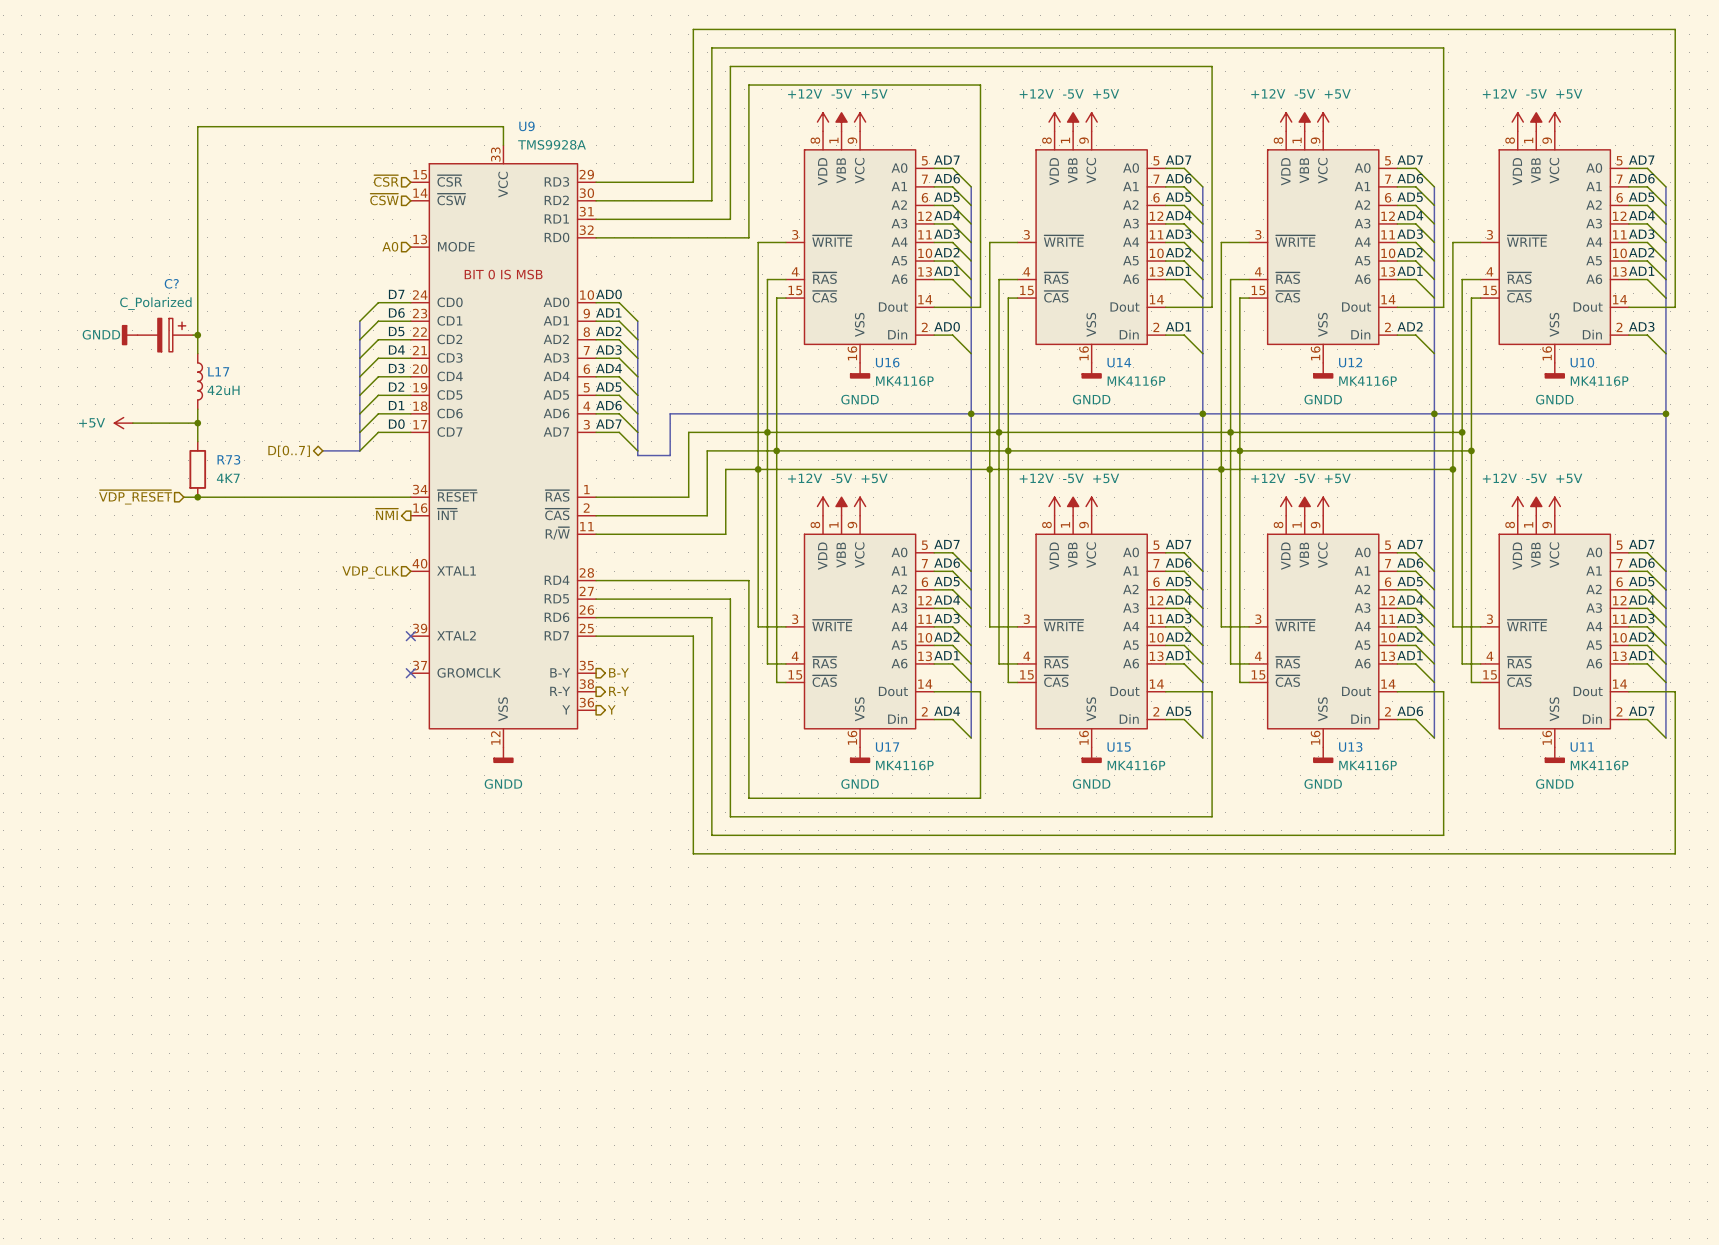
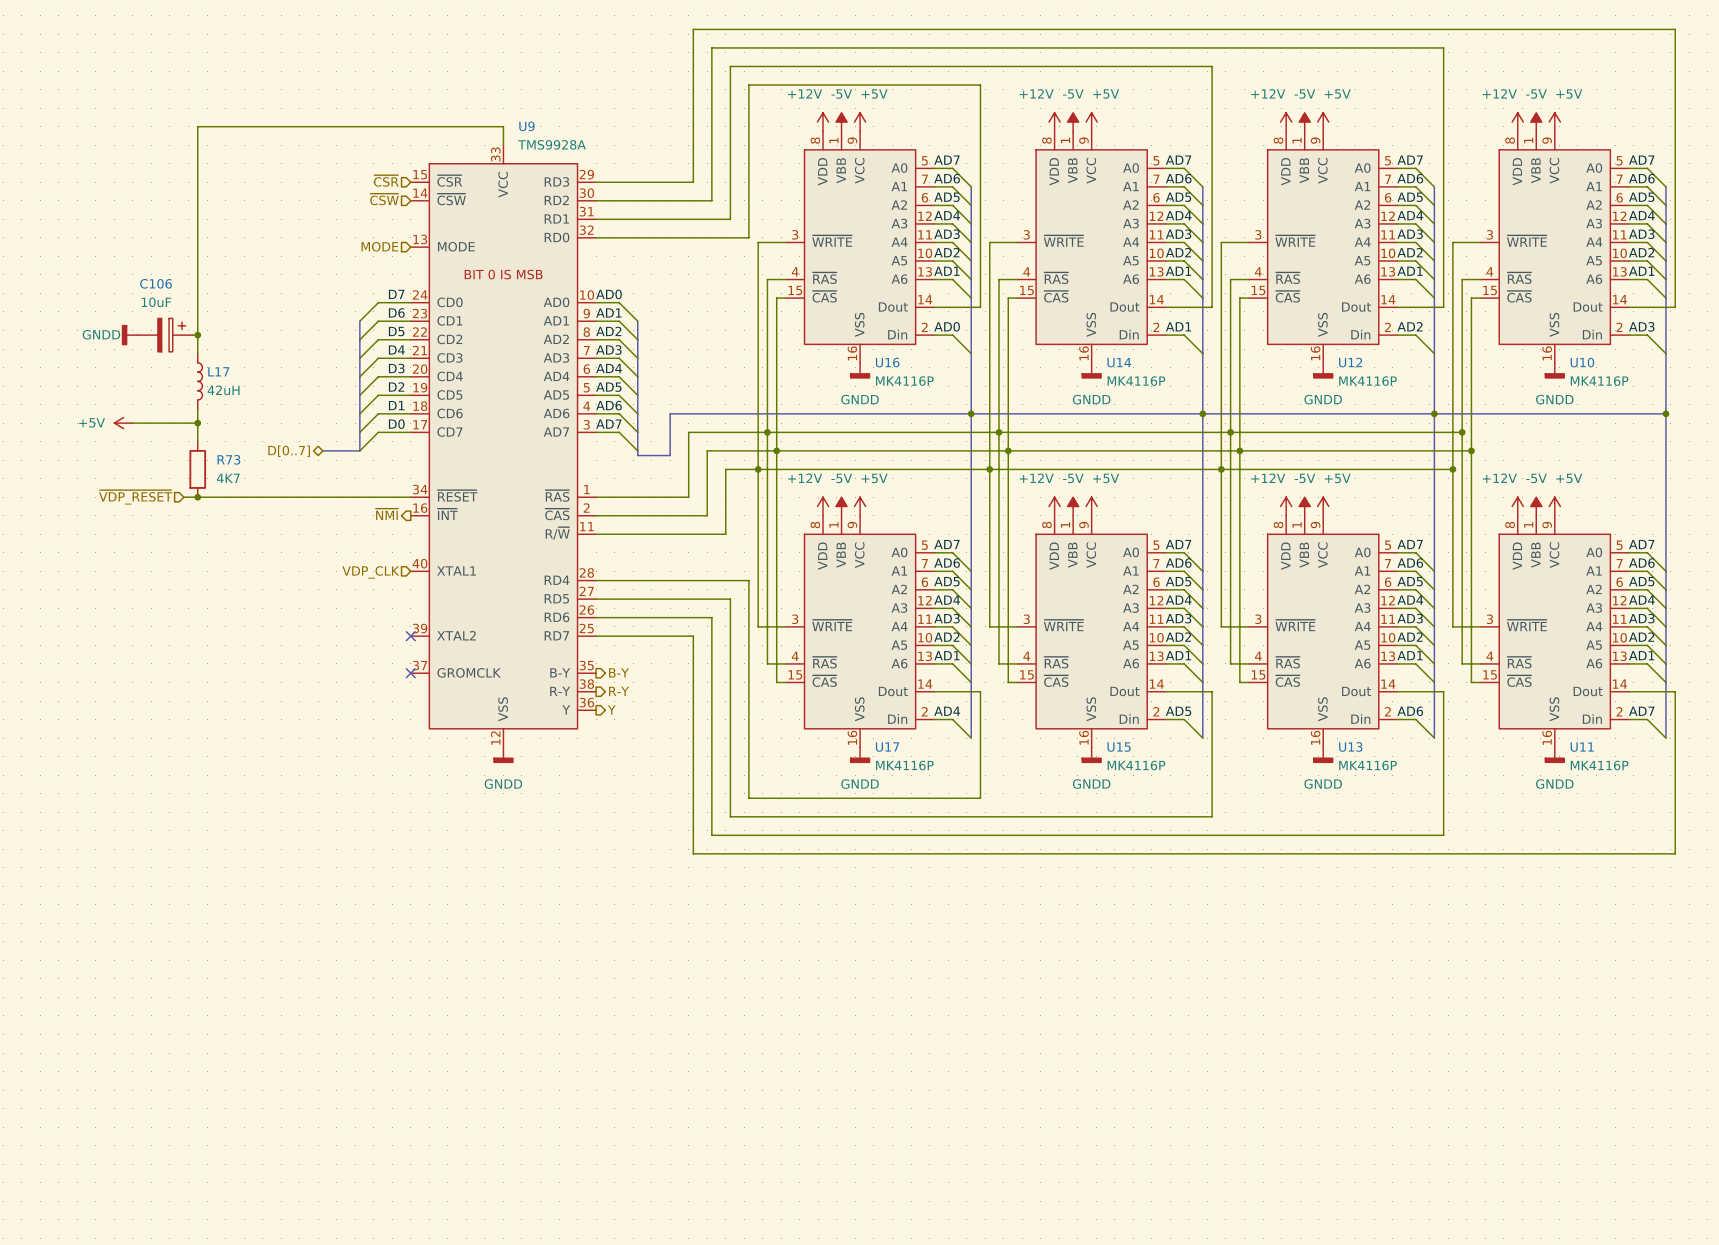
hierarchical label: A0 (390, 246) -> MODE (379, 246)
C? name: C? (171, 283) -> C106 (156, 283)
C? value: C_Polarized (155, 303) -> 10uF (156, 302)

